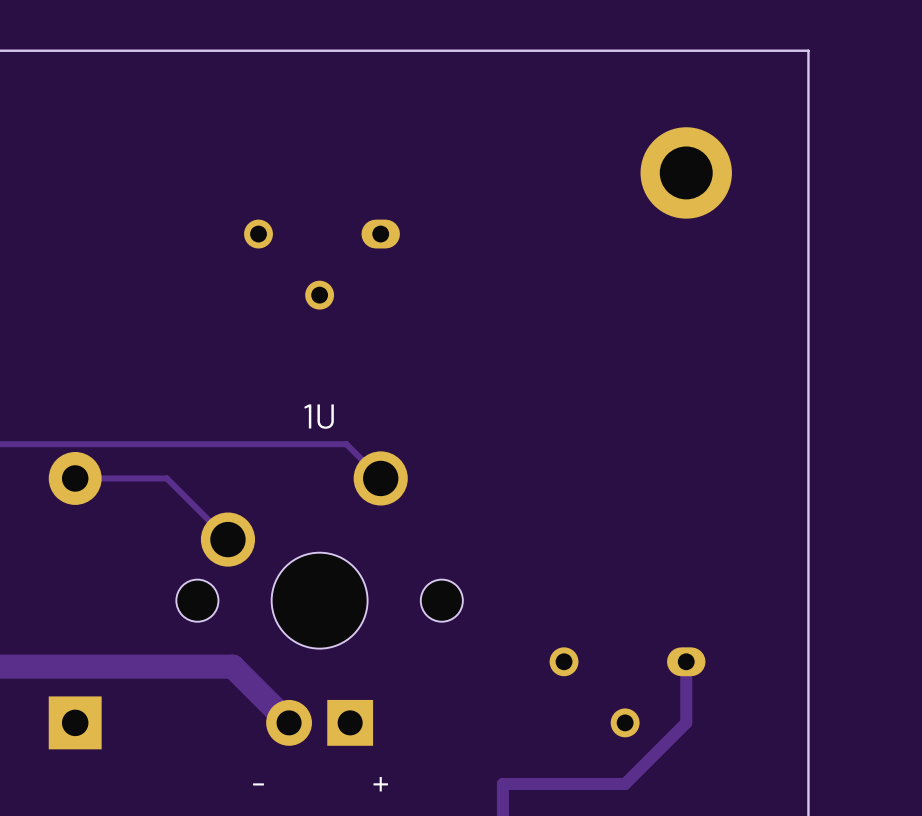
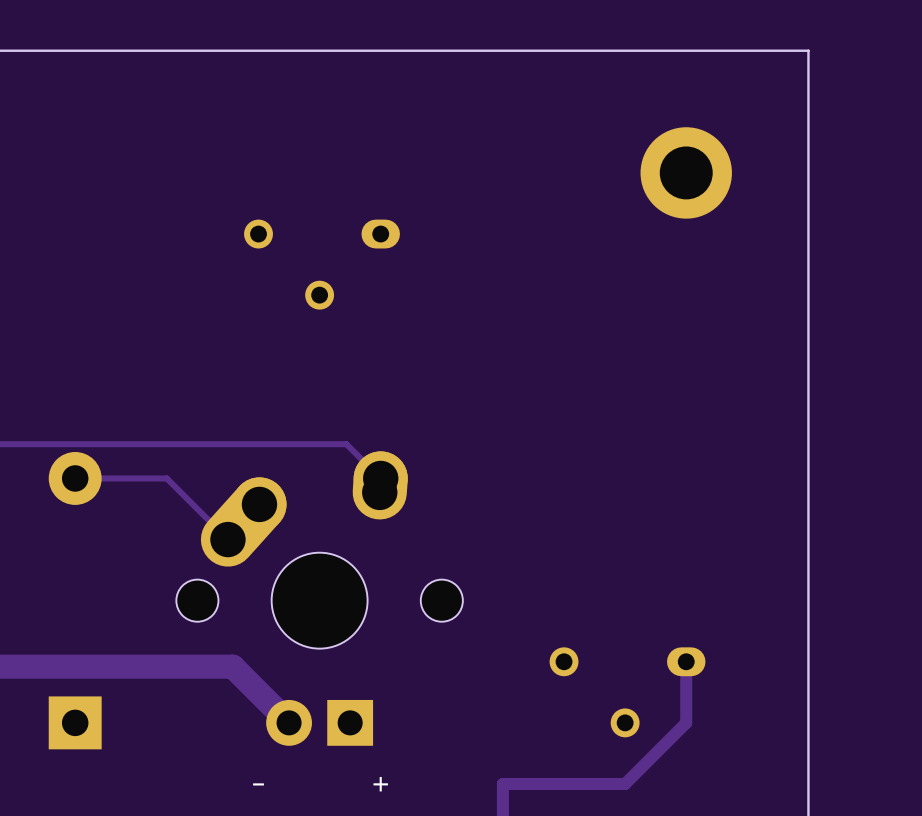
part footprint: [176, 451, 463, 746] -> [176, 451, 463, 746]

